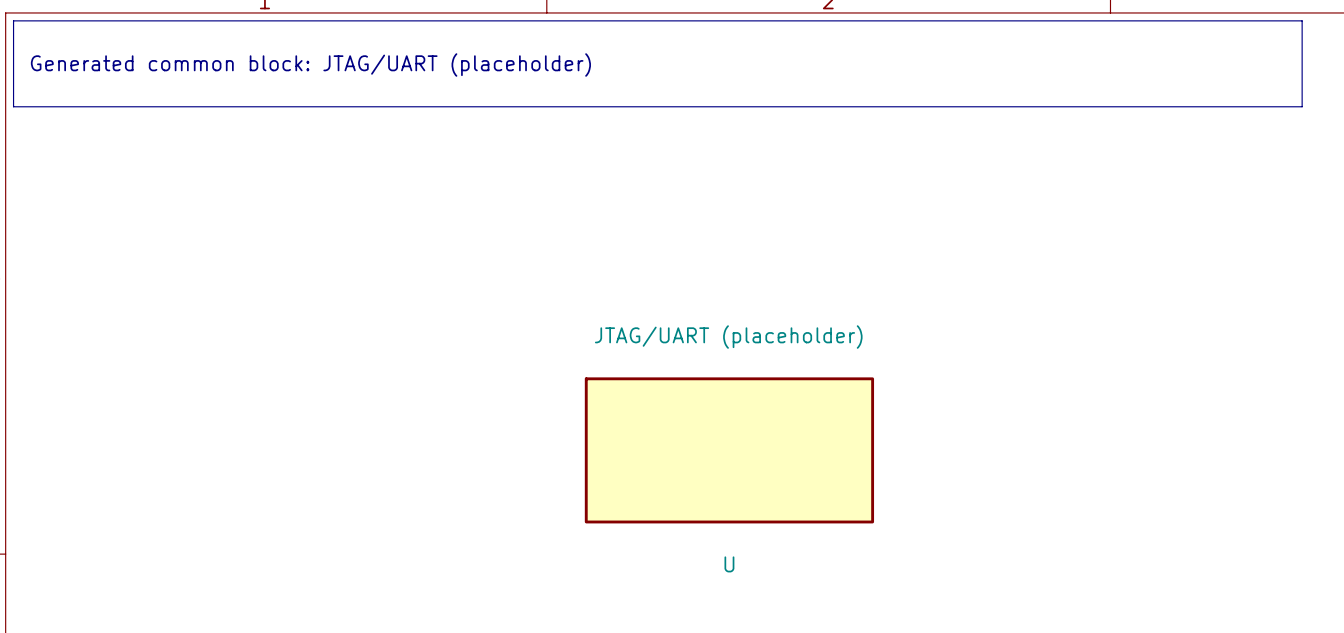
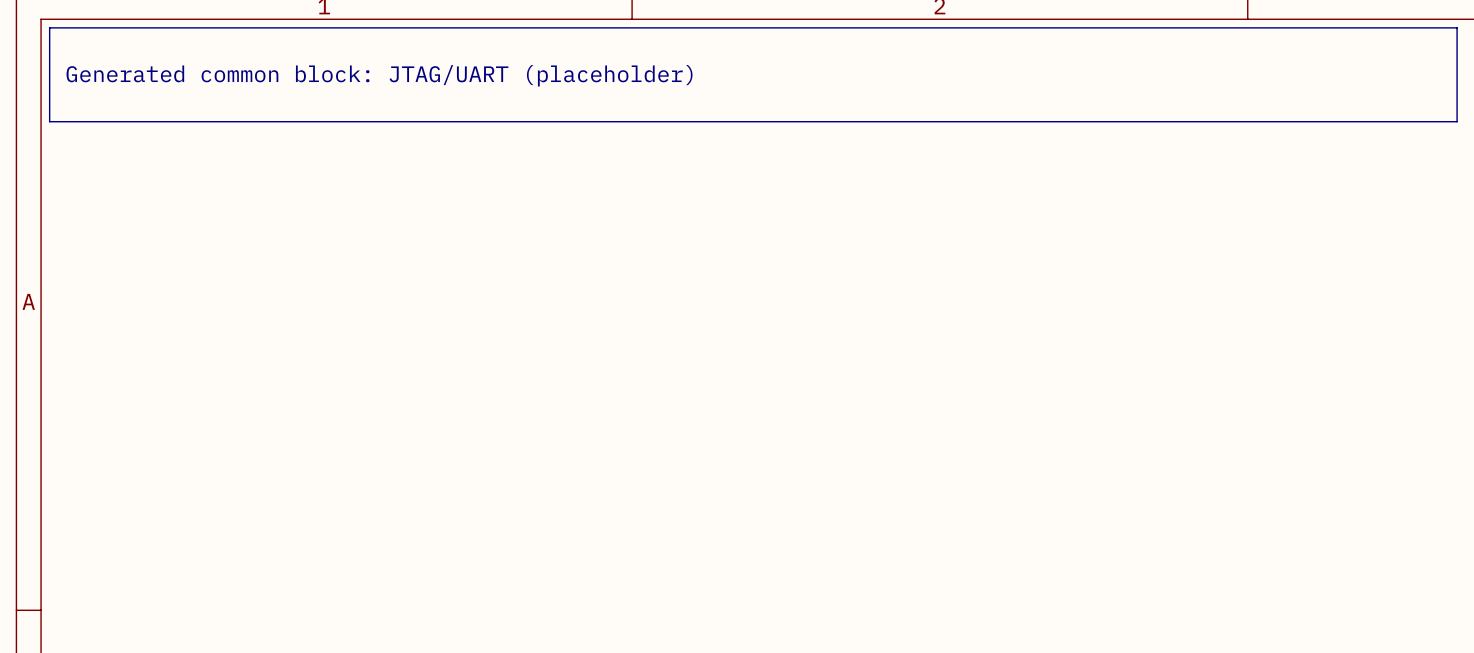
U: JTAG/UART (placeholder) (729, 450) -> none

